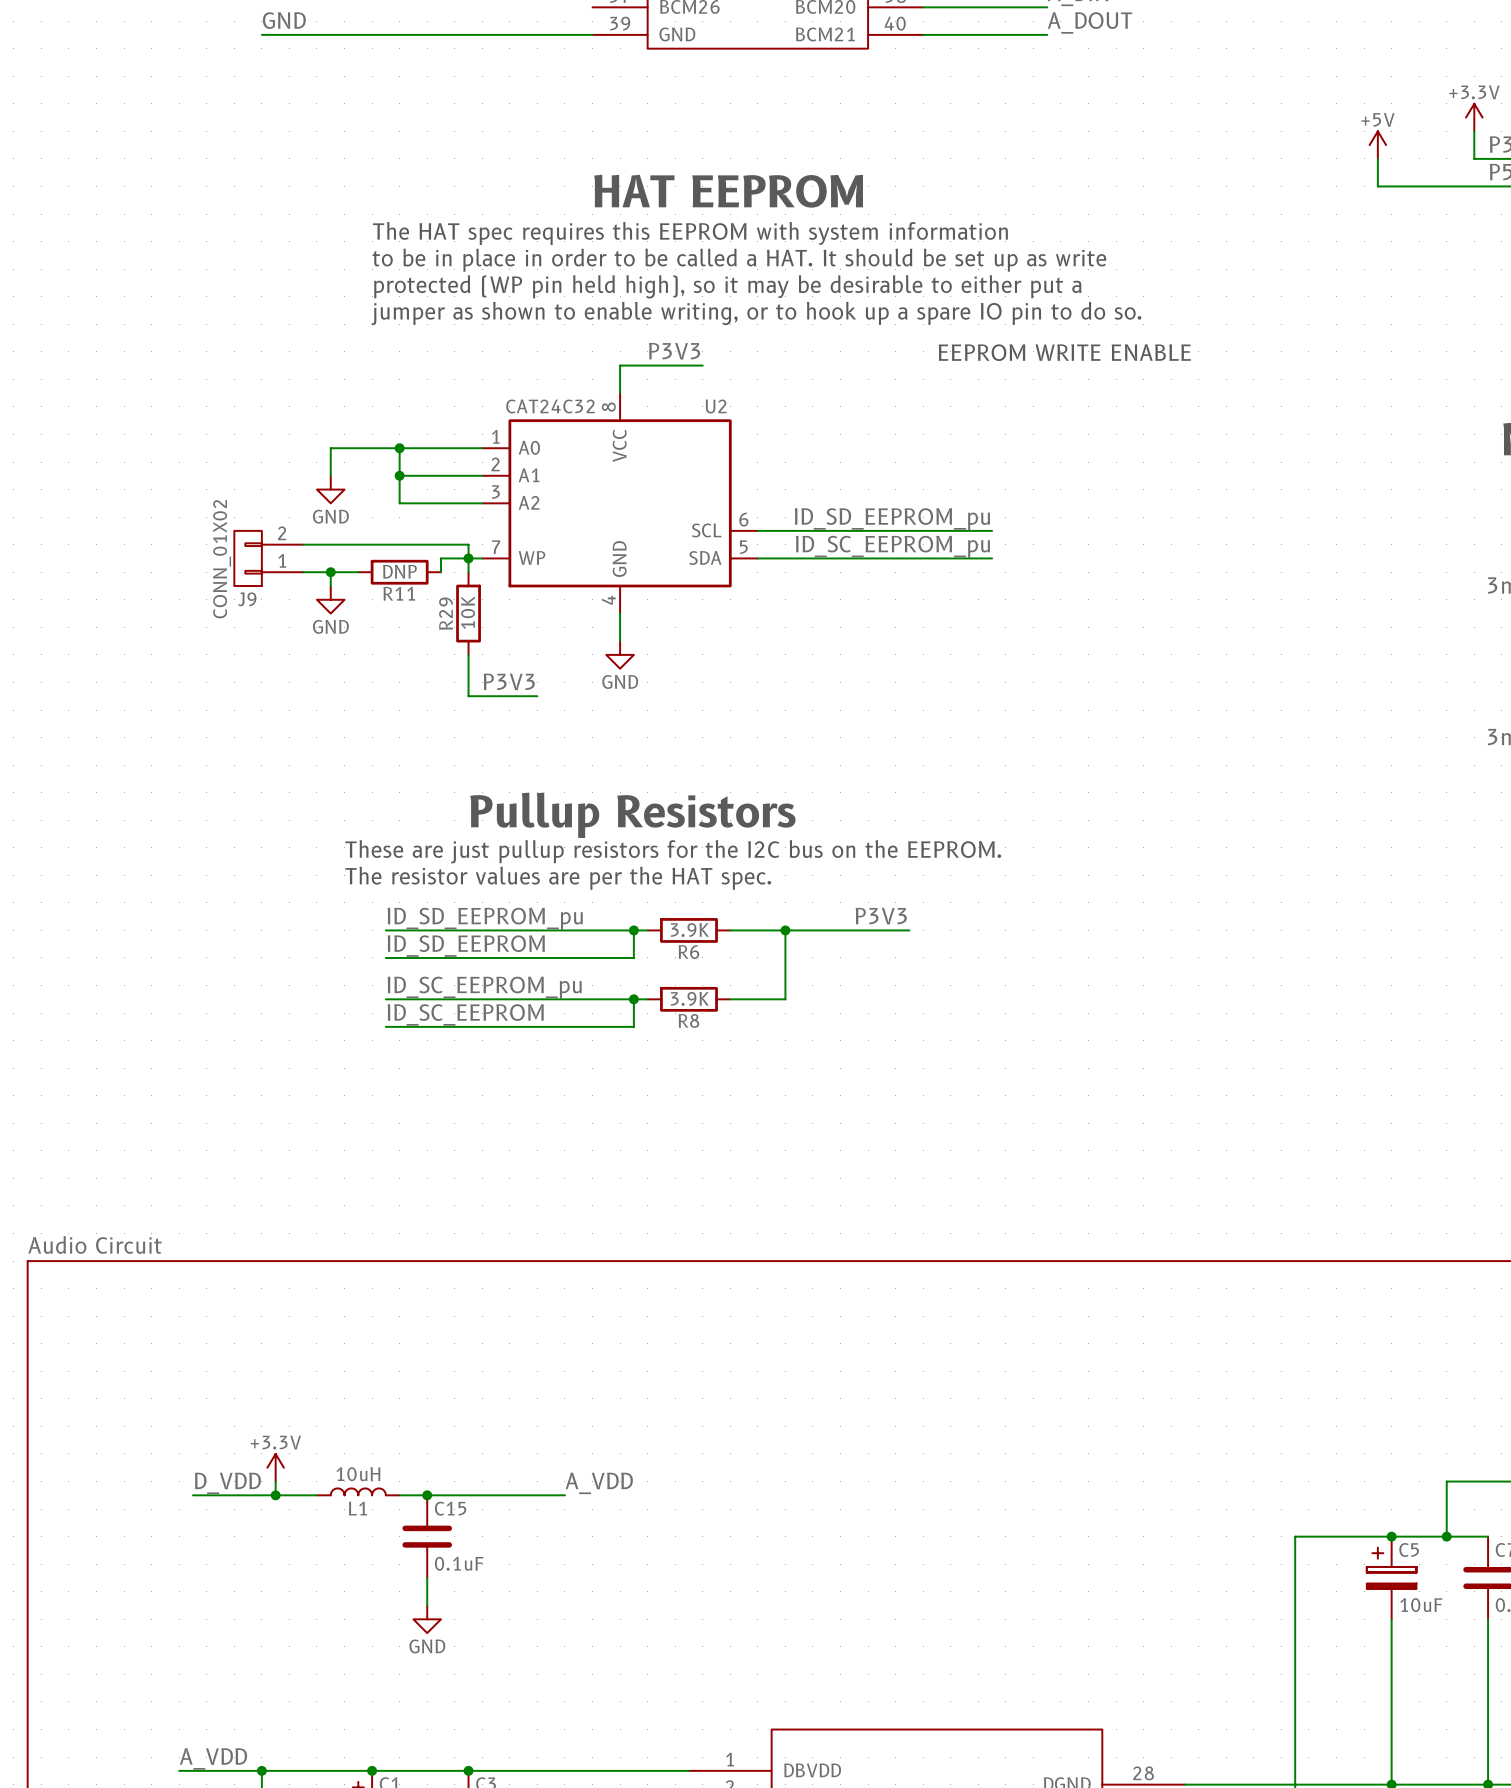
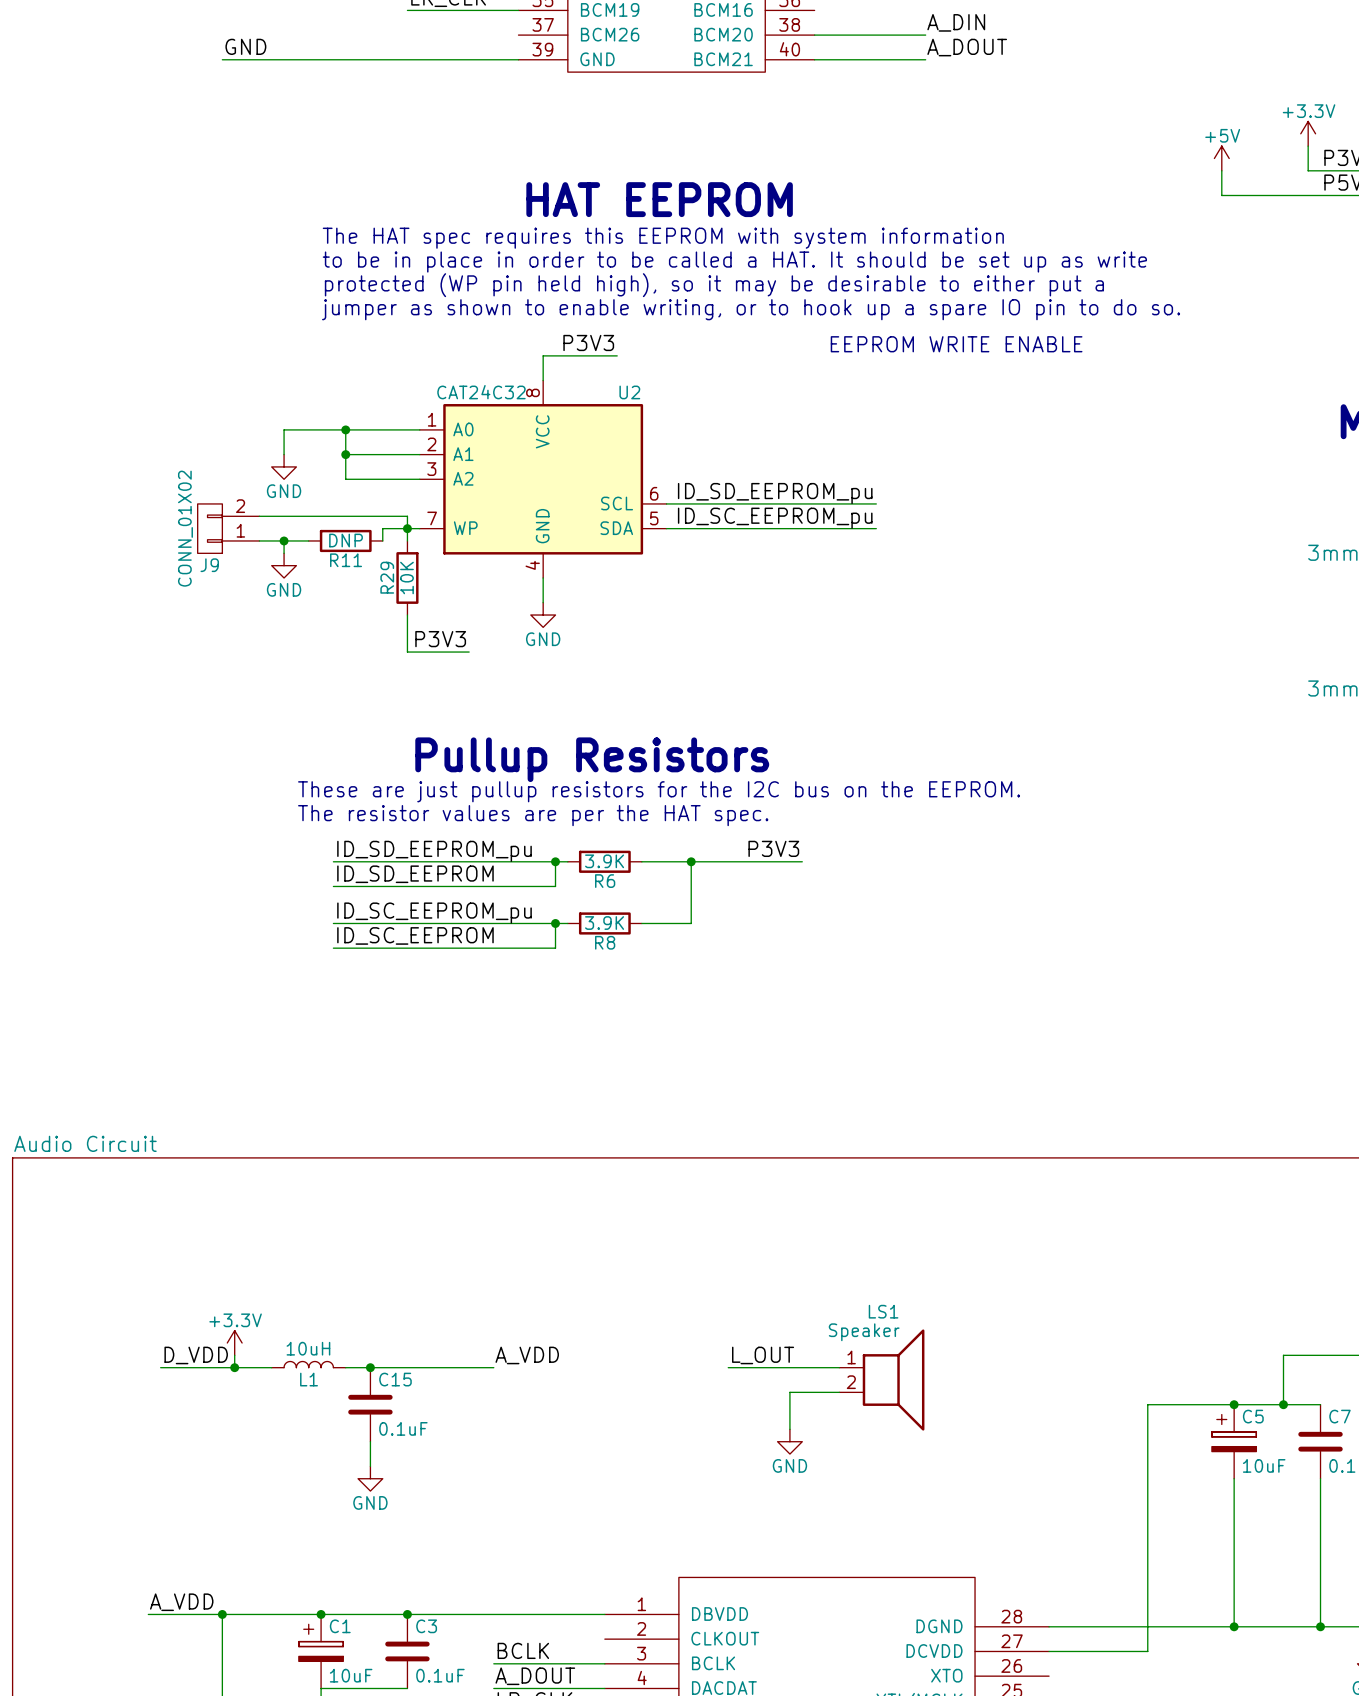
label: none -> L_OUT (763, 1355)
wire: none -> (728, 1367) (839, 1367)
LS1: none -> Speaker (881, 1380)
wire: none -> (839, 1392) (789, 1392) (789, 1429)
power symbol: none -> GND (789, 1441)

